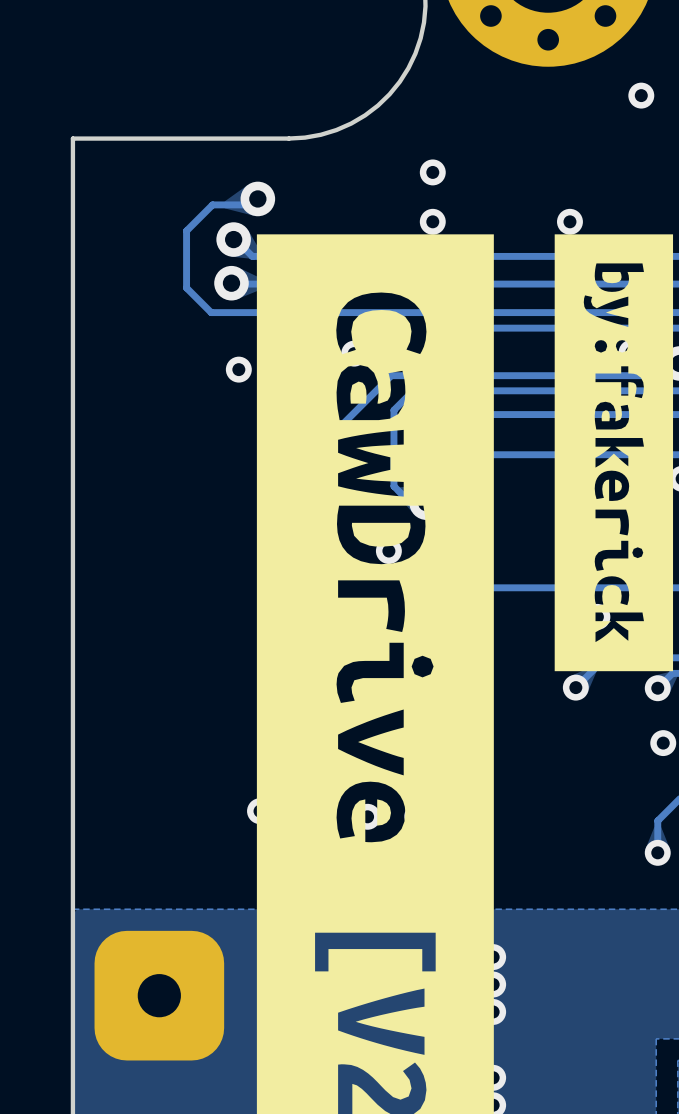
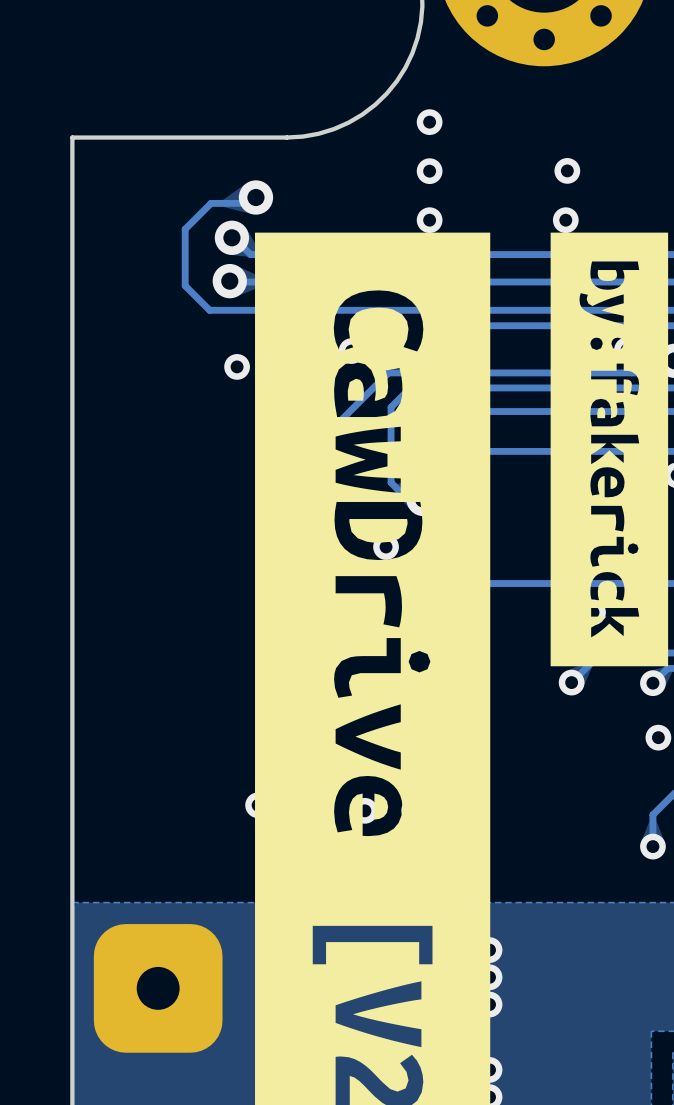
via: (641, 95) -> none
via: none -> (429, 122)
via: none -> (567, 170)

